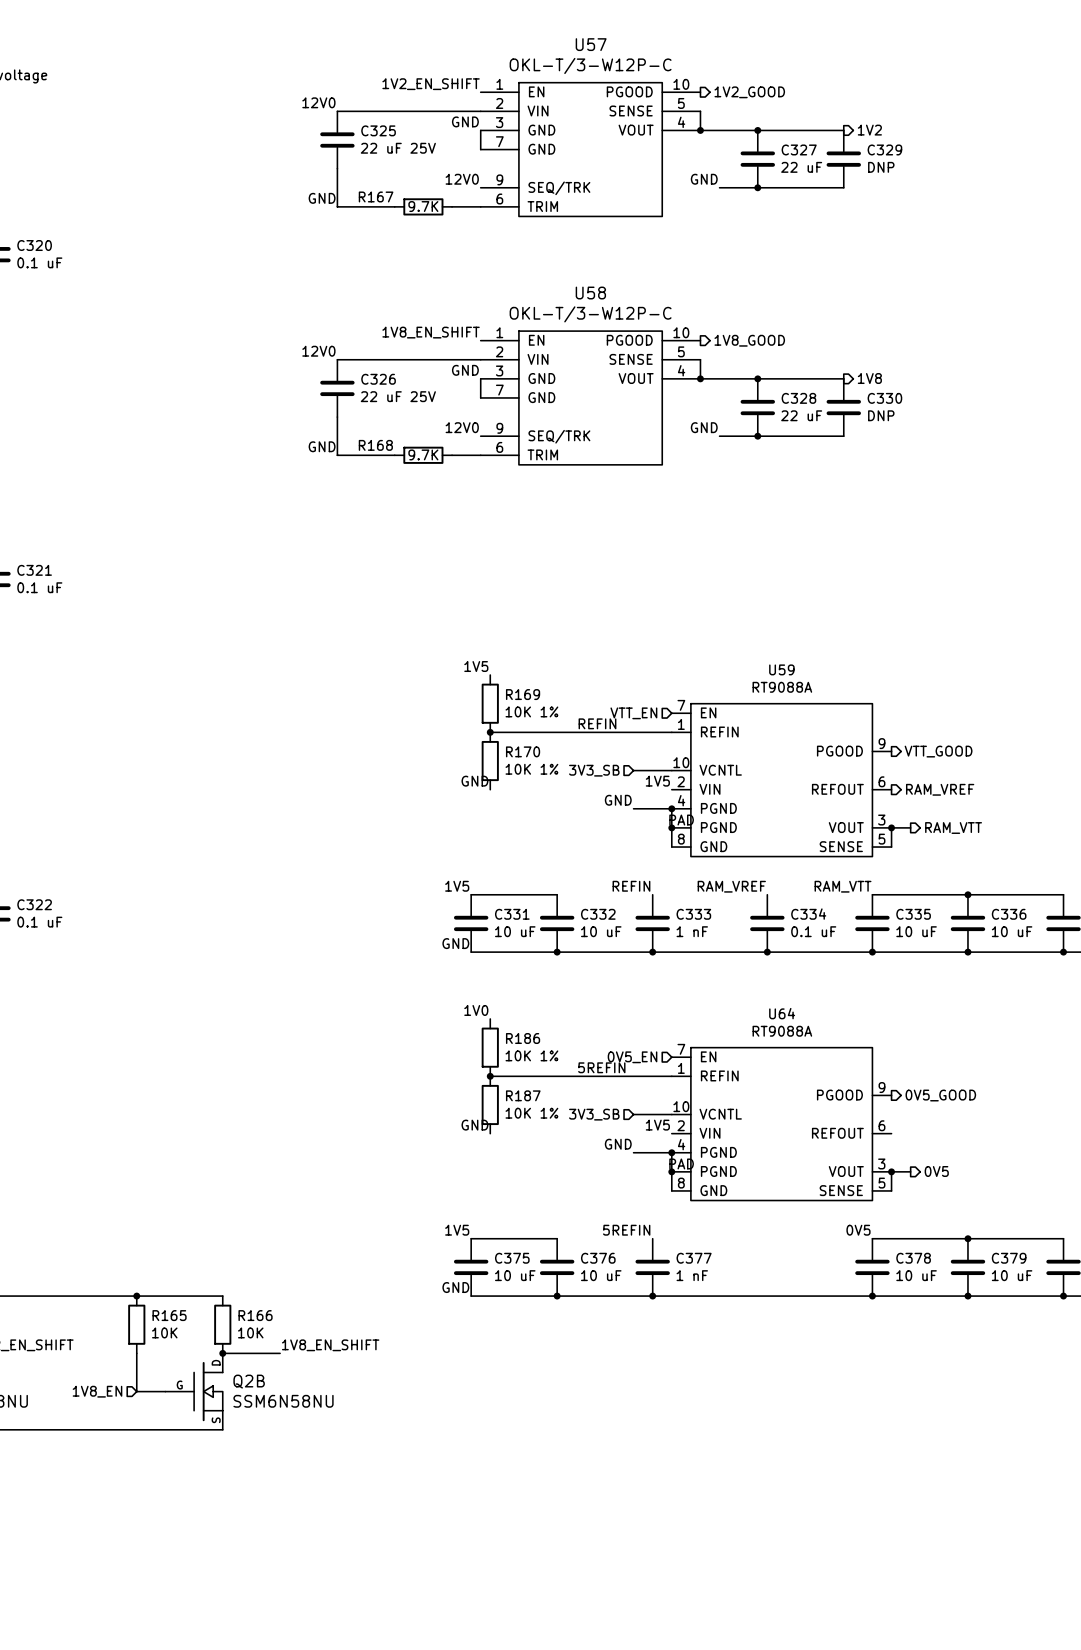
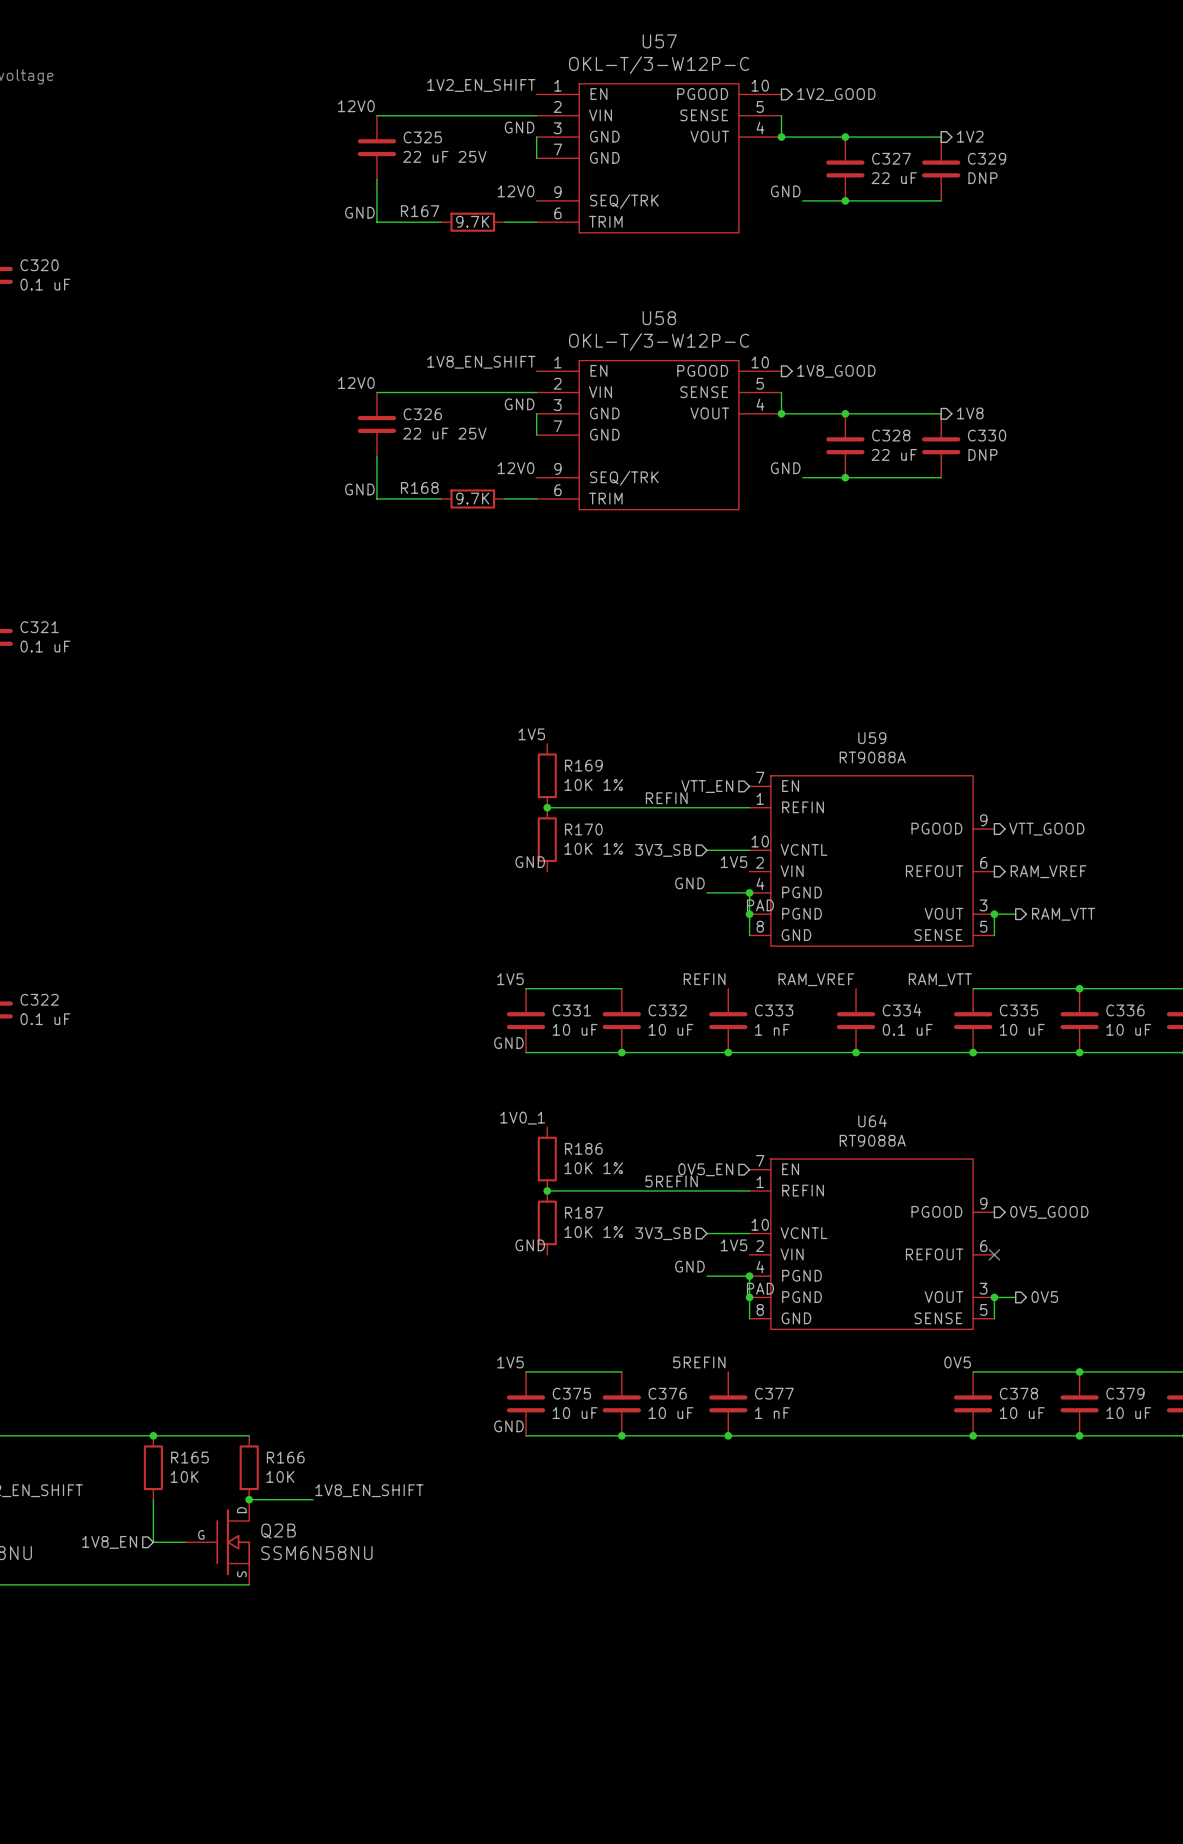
label: 1V0 (476, 1010) -> 1V0_1 (522, 1118)
no-connect mark: none -> (994, 1254)

